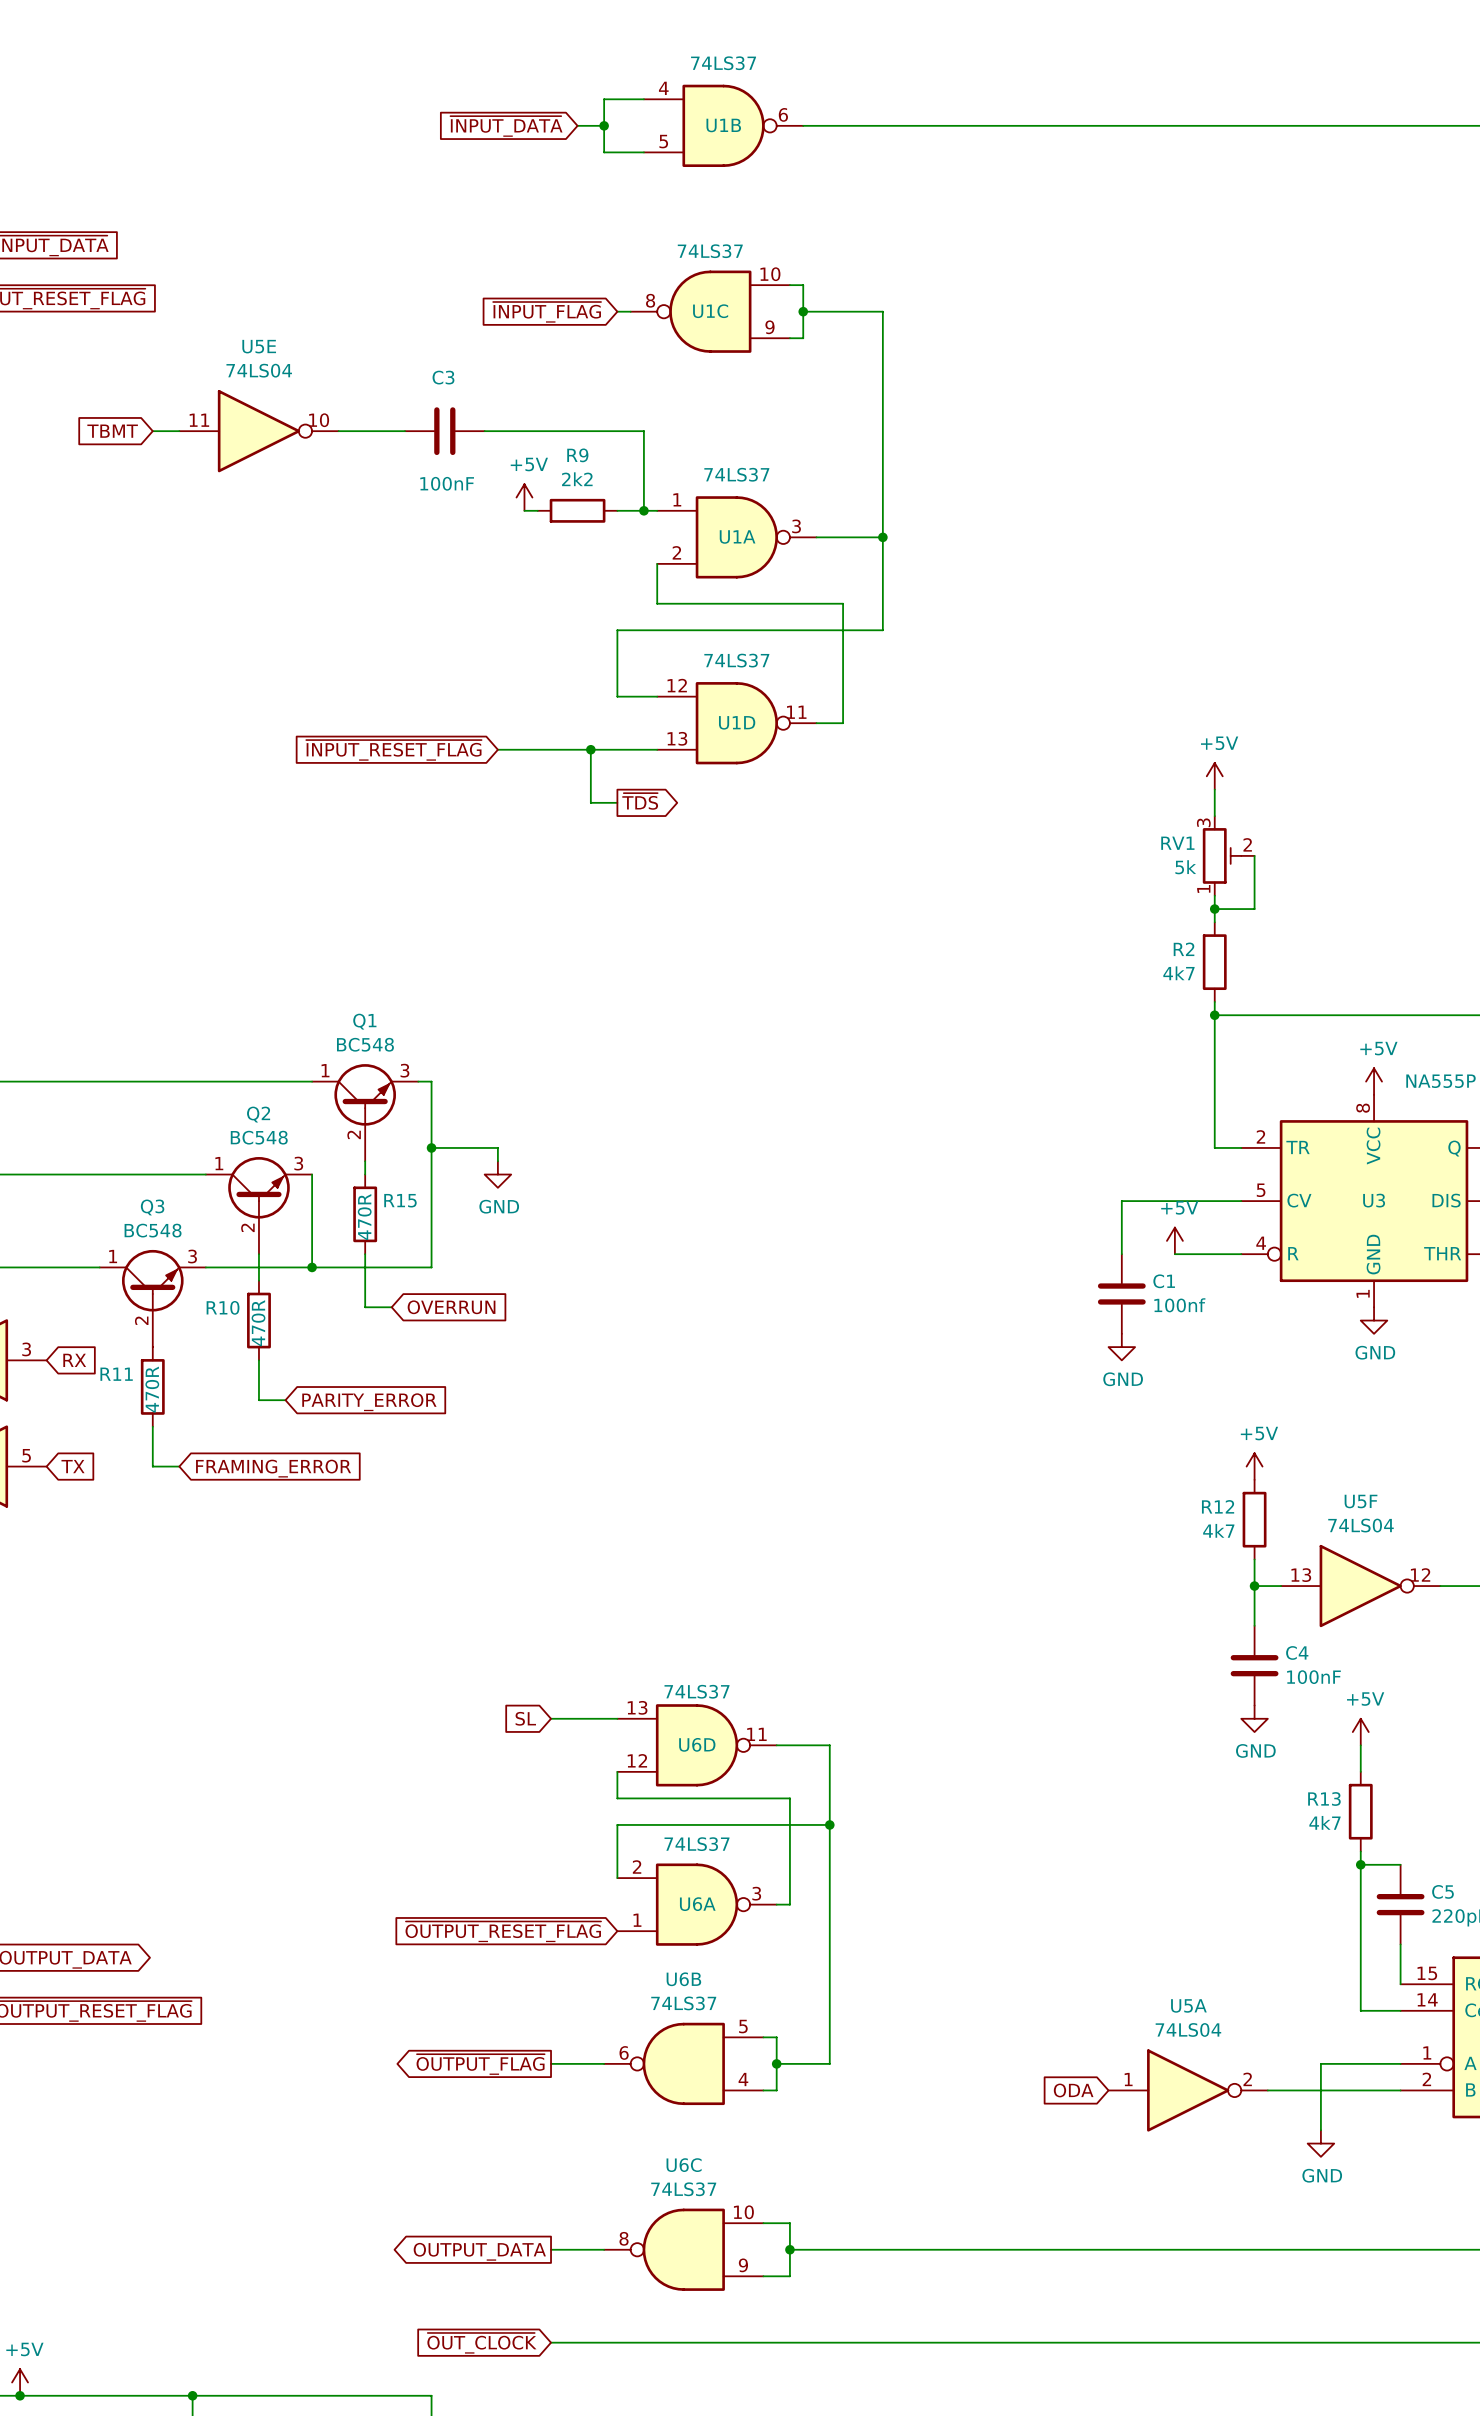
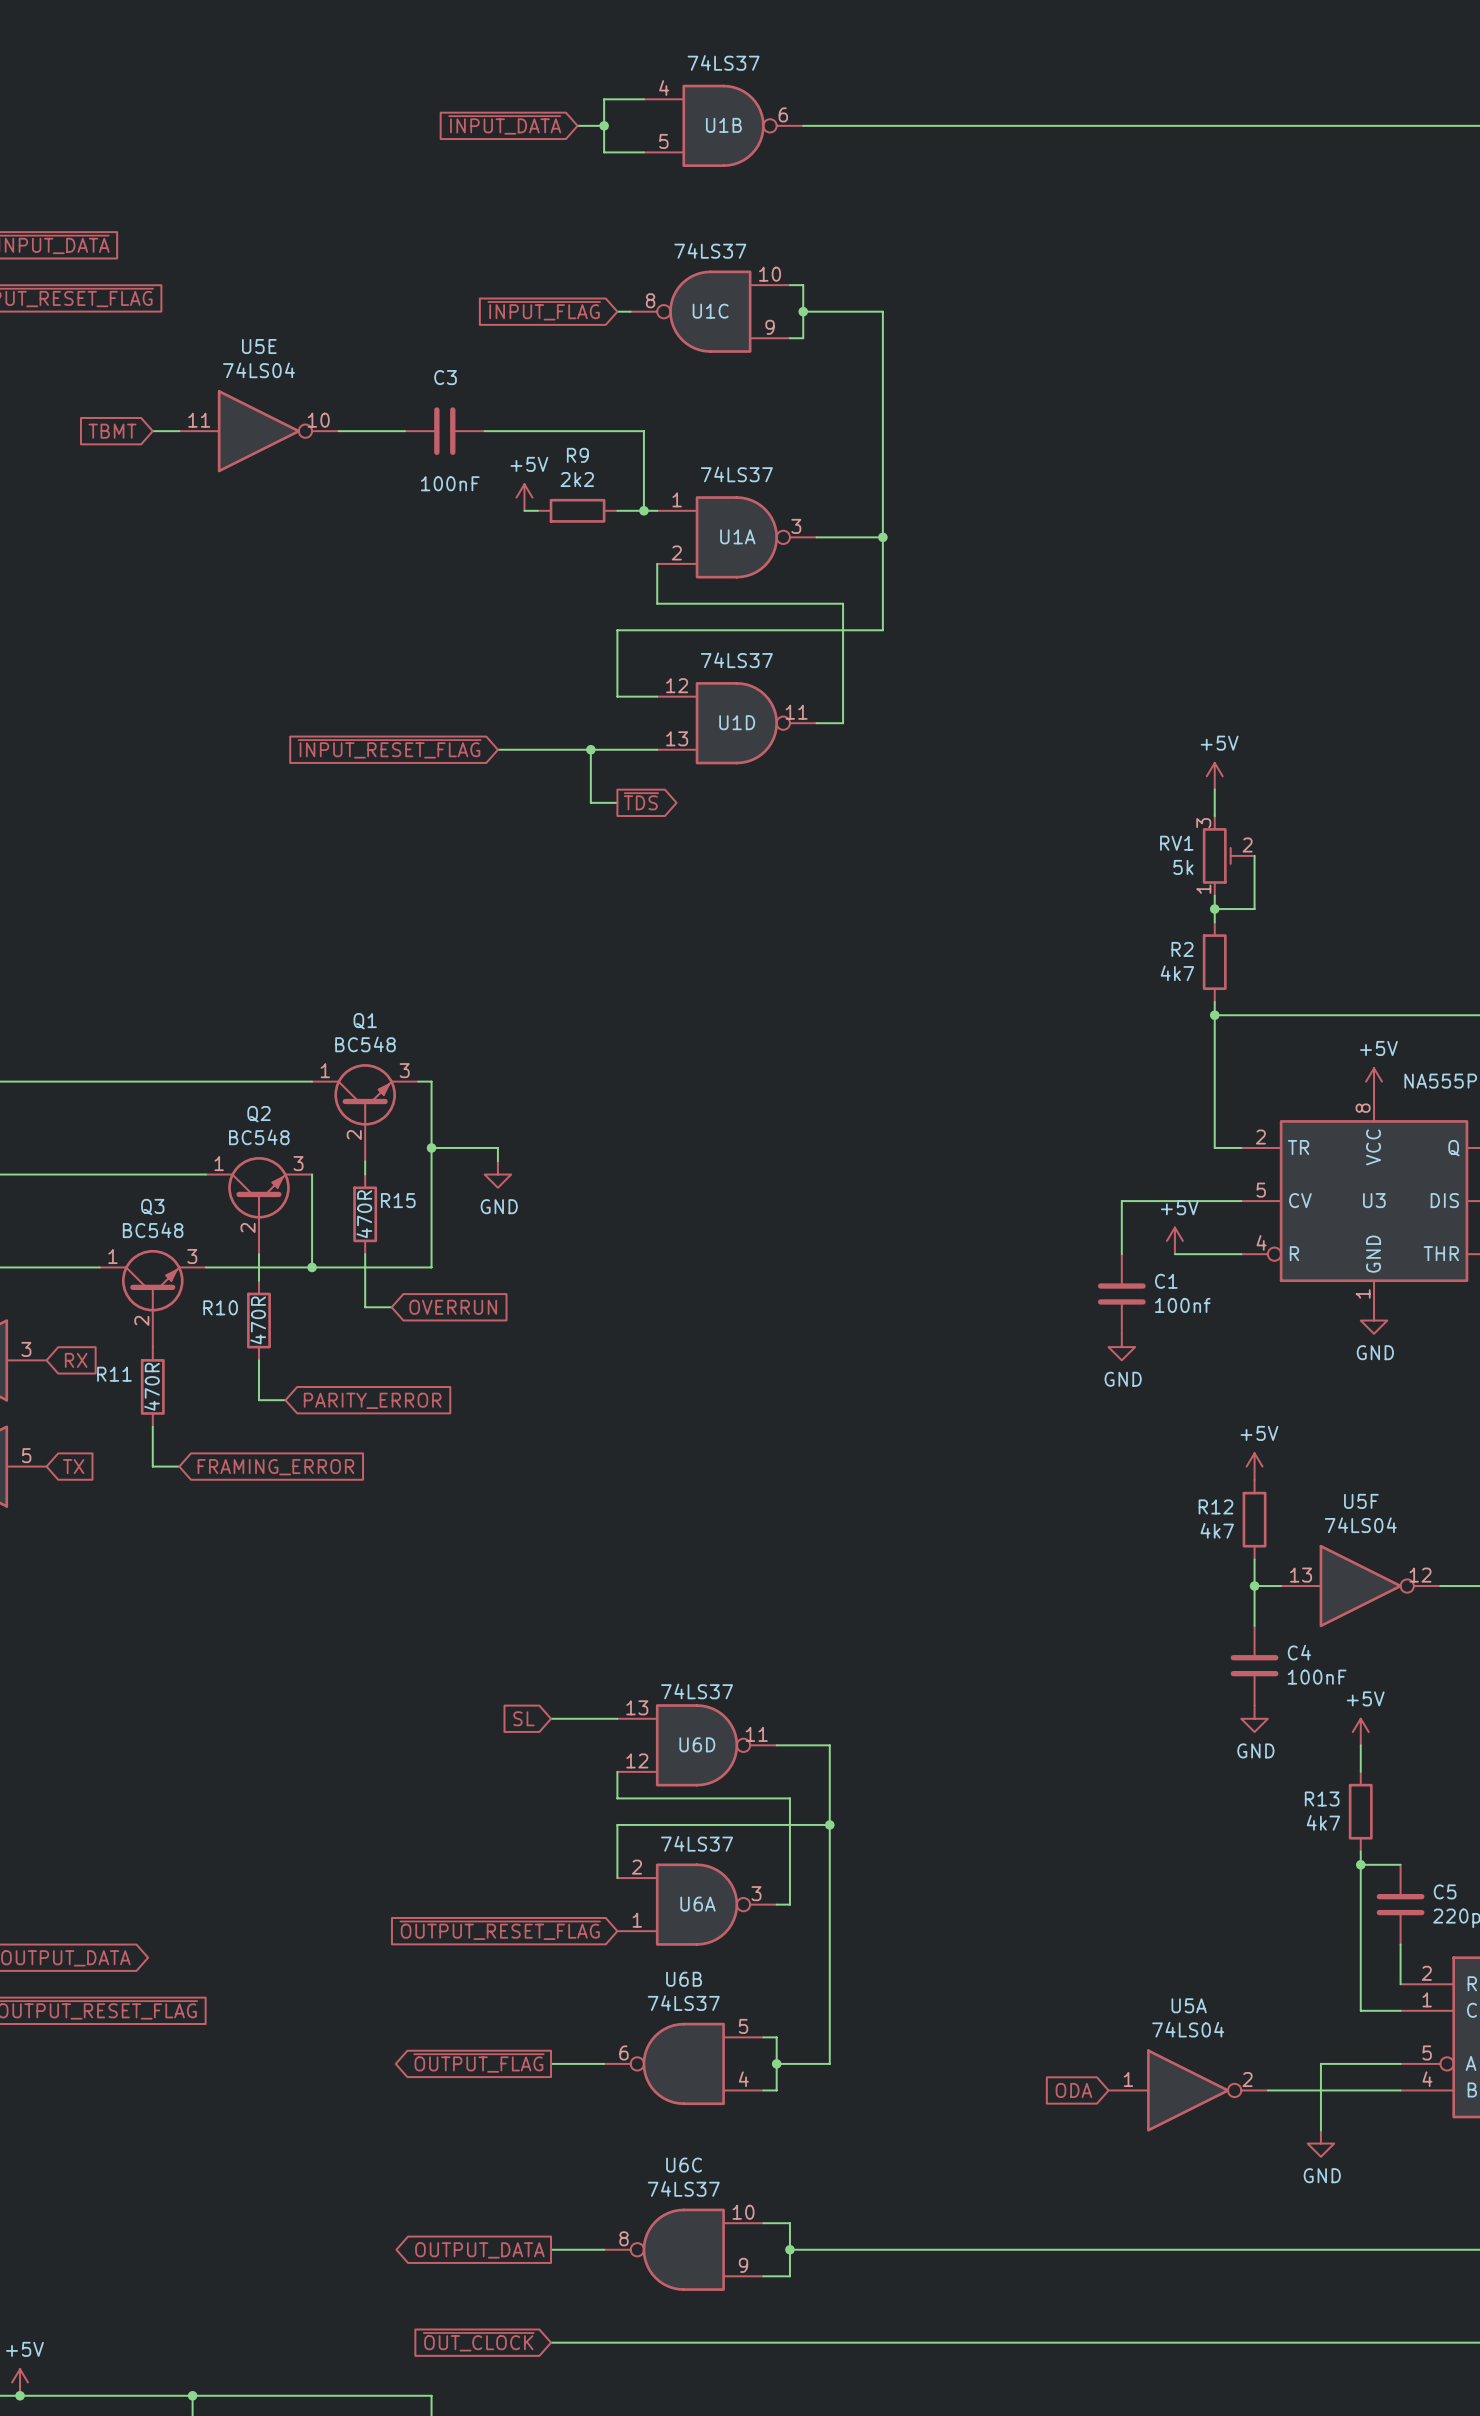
part pin number: 15 (1427, 1973) -> 2 (1426, 1973)
part pin number: 14 (1427, 1999) -> 1 (1427, 1999)
part pin number: 1 (1427, 2052) -> 5 (1427, 2052)
part pin number: 2 (1426, 2079) -> 4 (1427, 2079)

